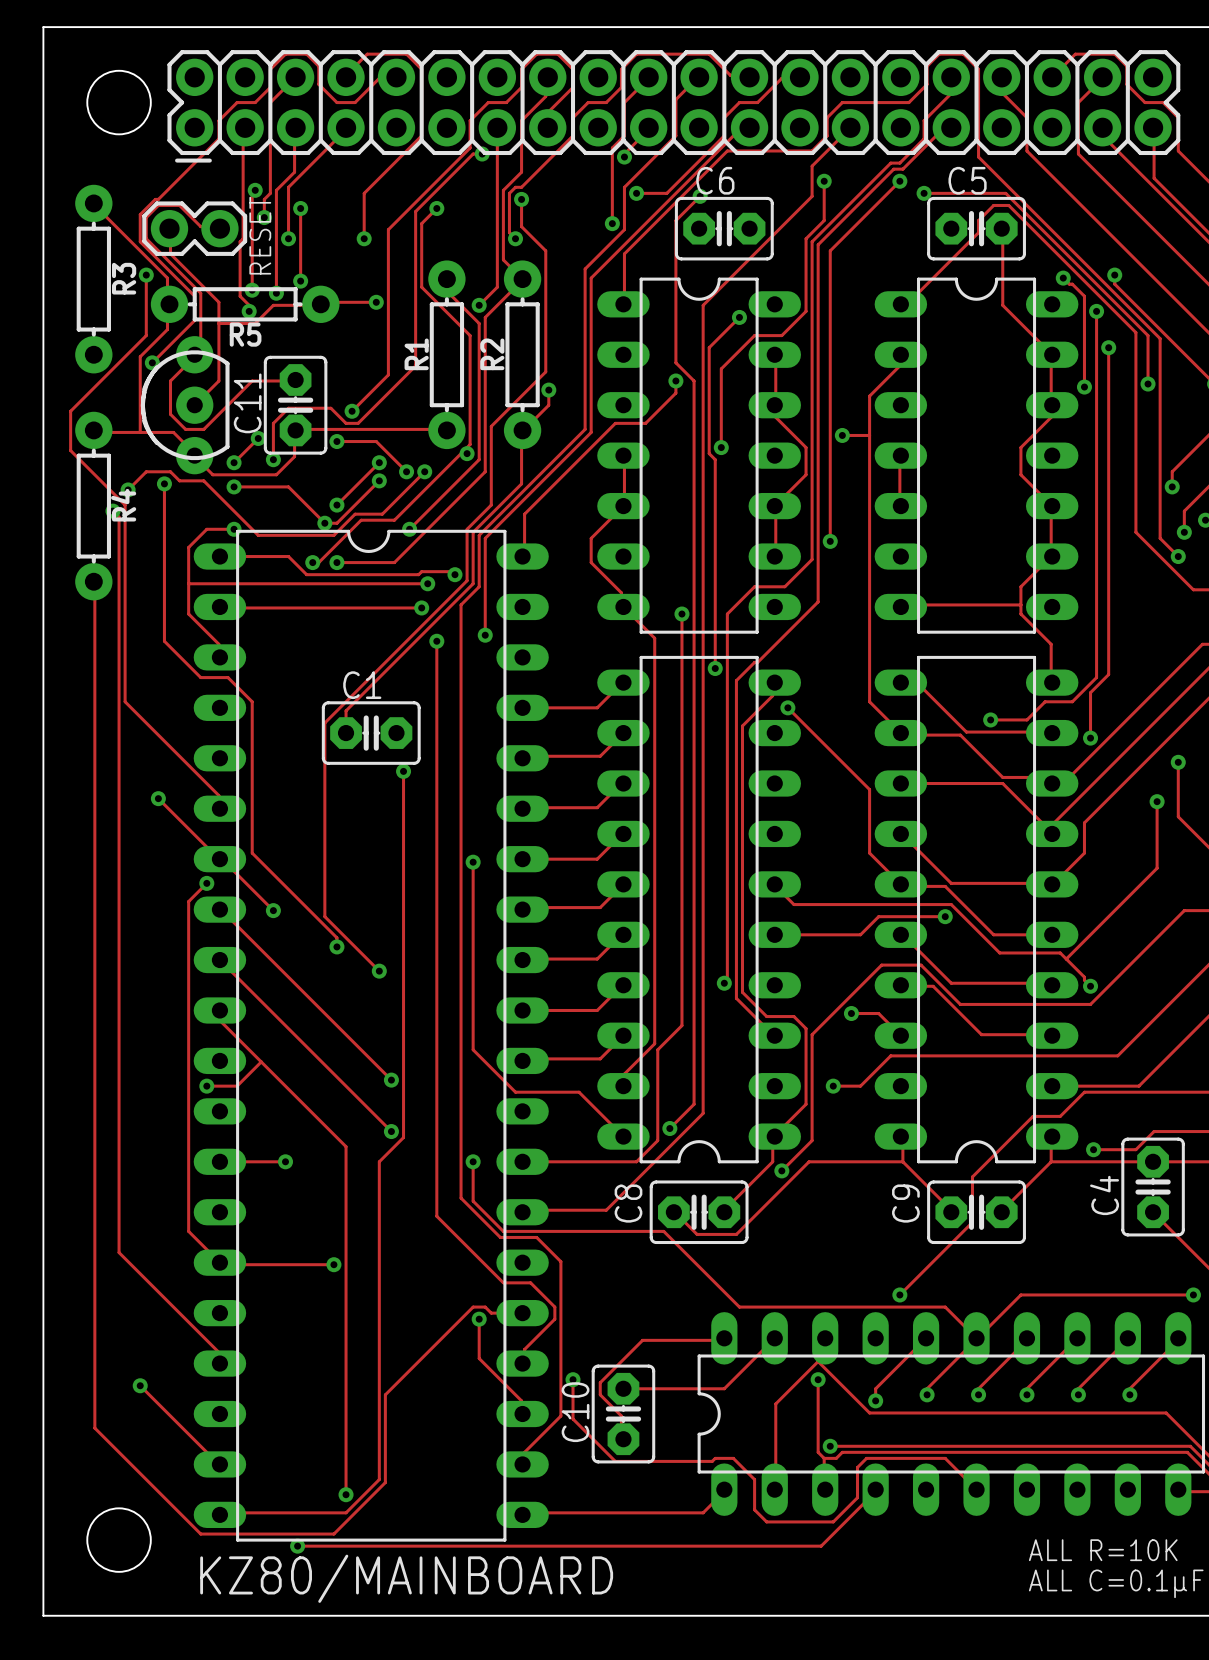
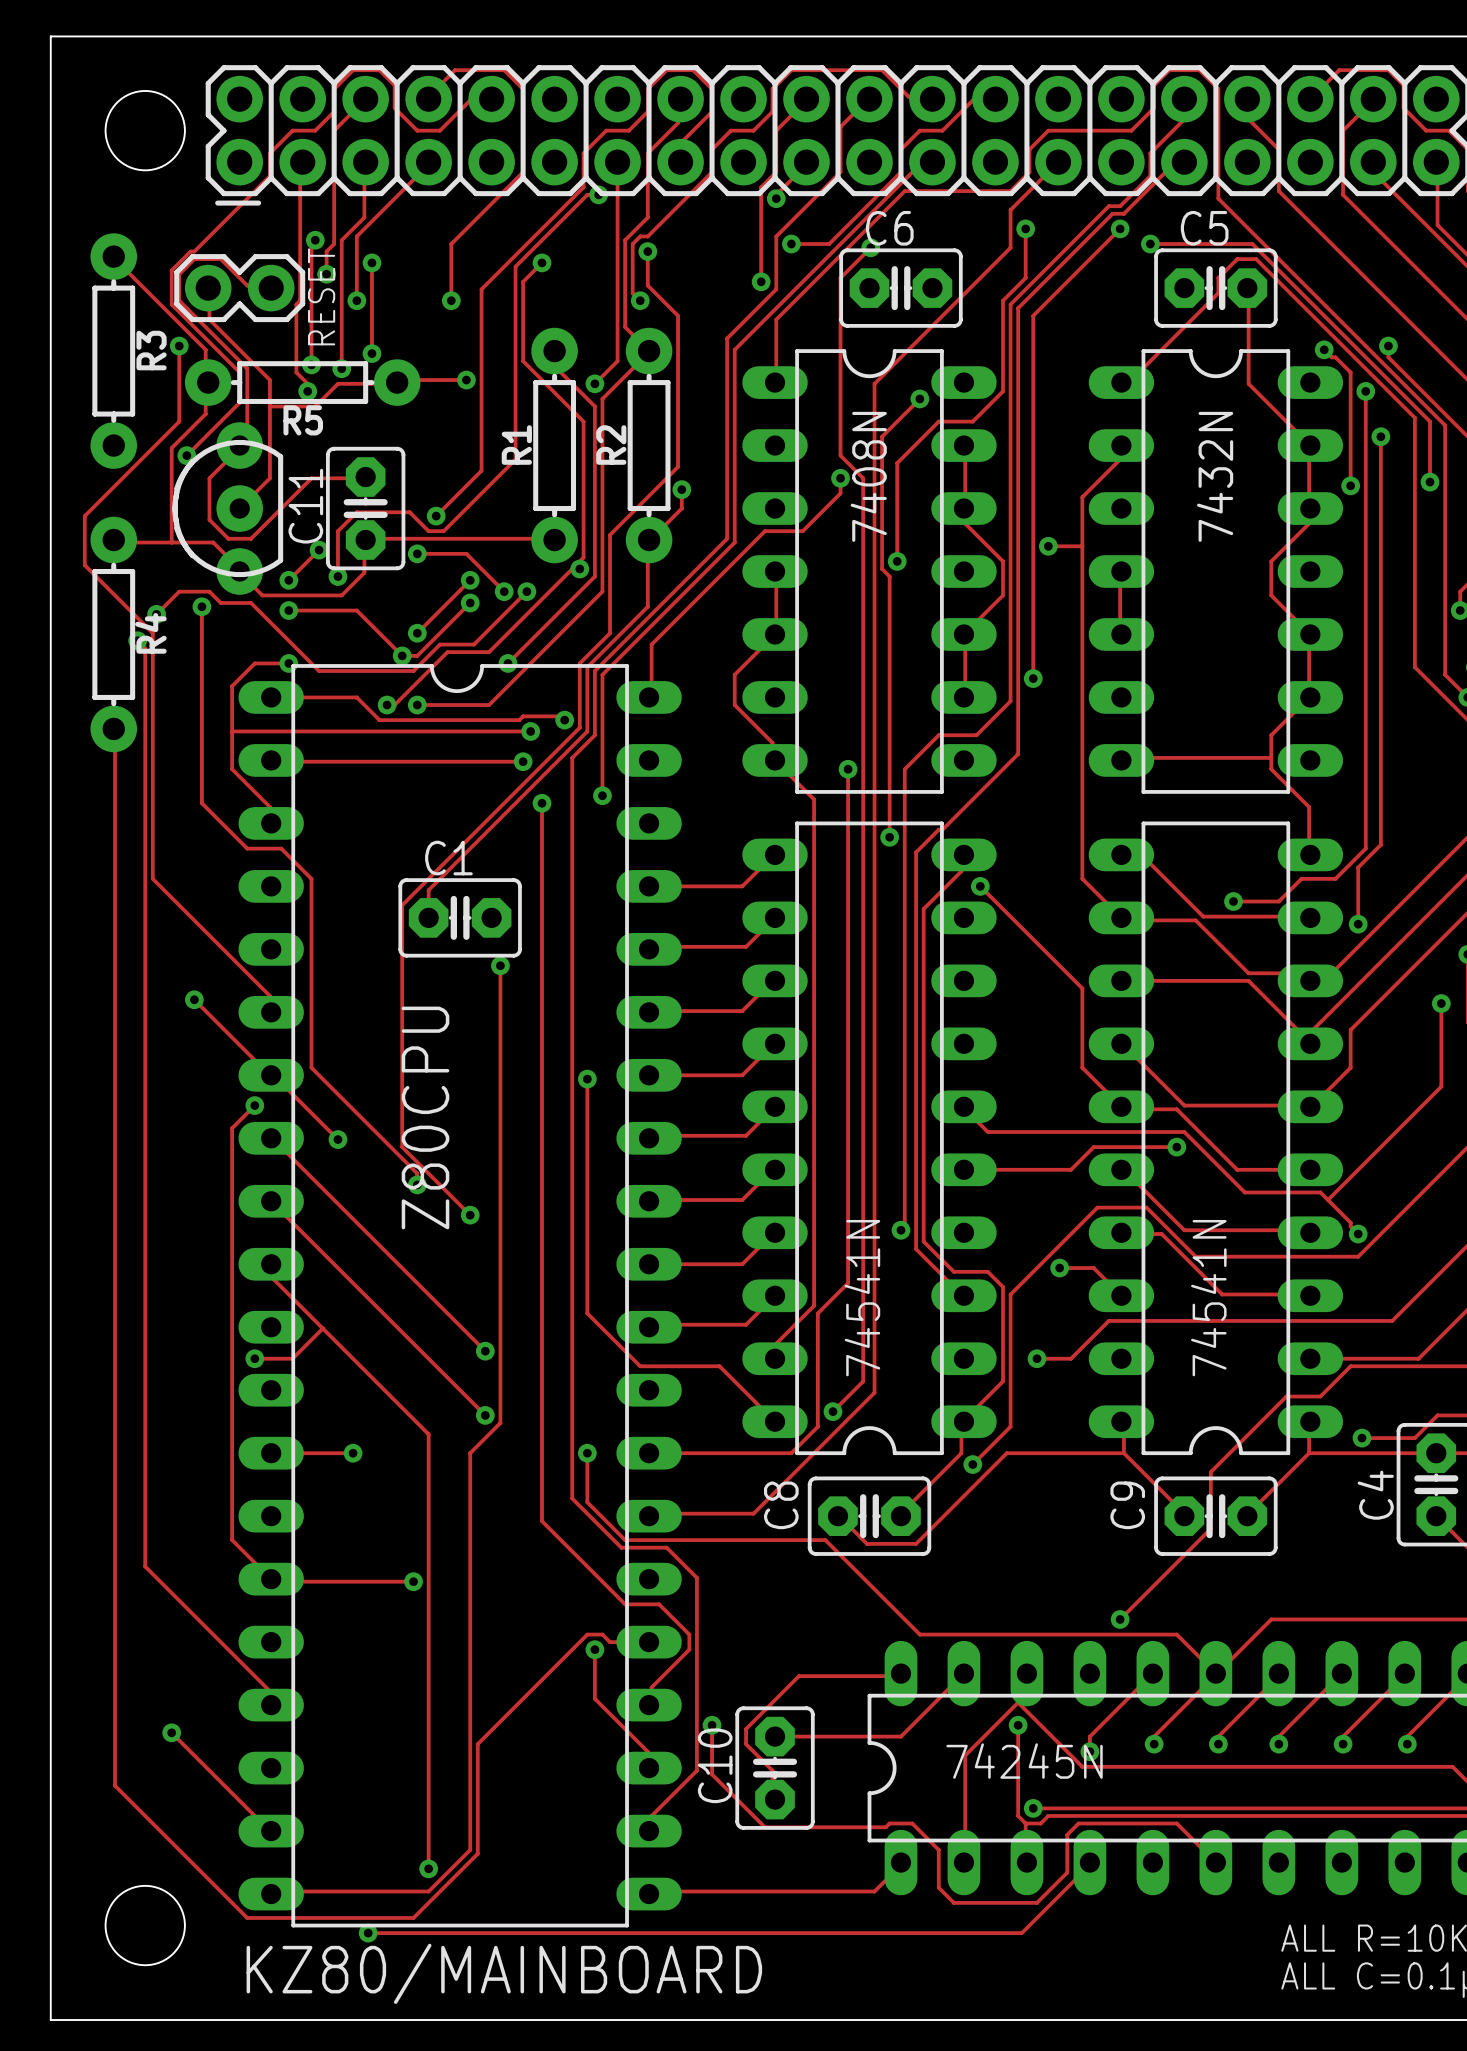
part value: none -> 7408N (868, 476)
part value: none -> 7432N (1215, 476)
part value: none -> Z80CPU (425, 1117)
part value: none -> 74541N (862, 1298)
part value: none -> 74541N (1208, 1298)
part value: none -> 74245N (1024, 1761)

